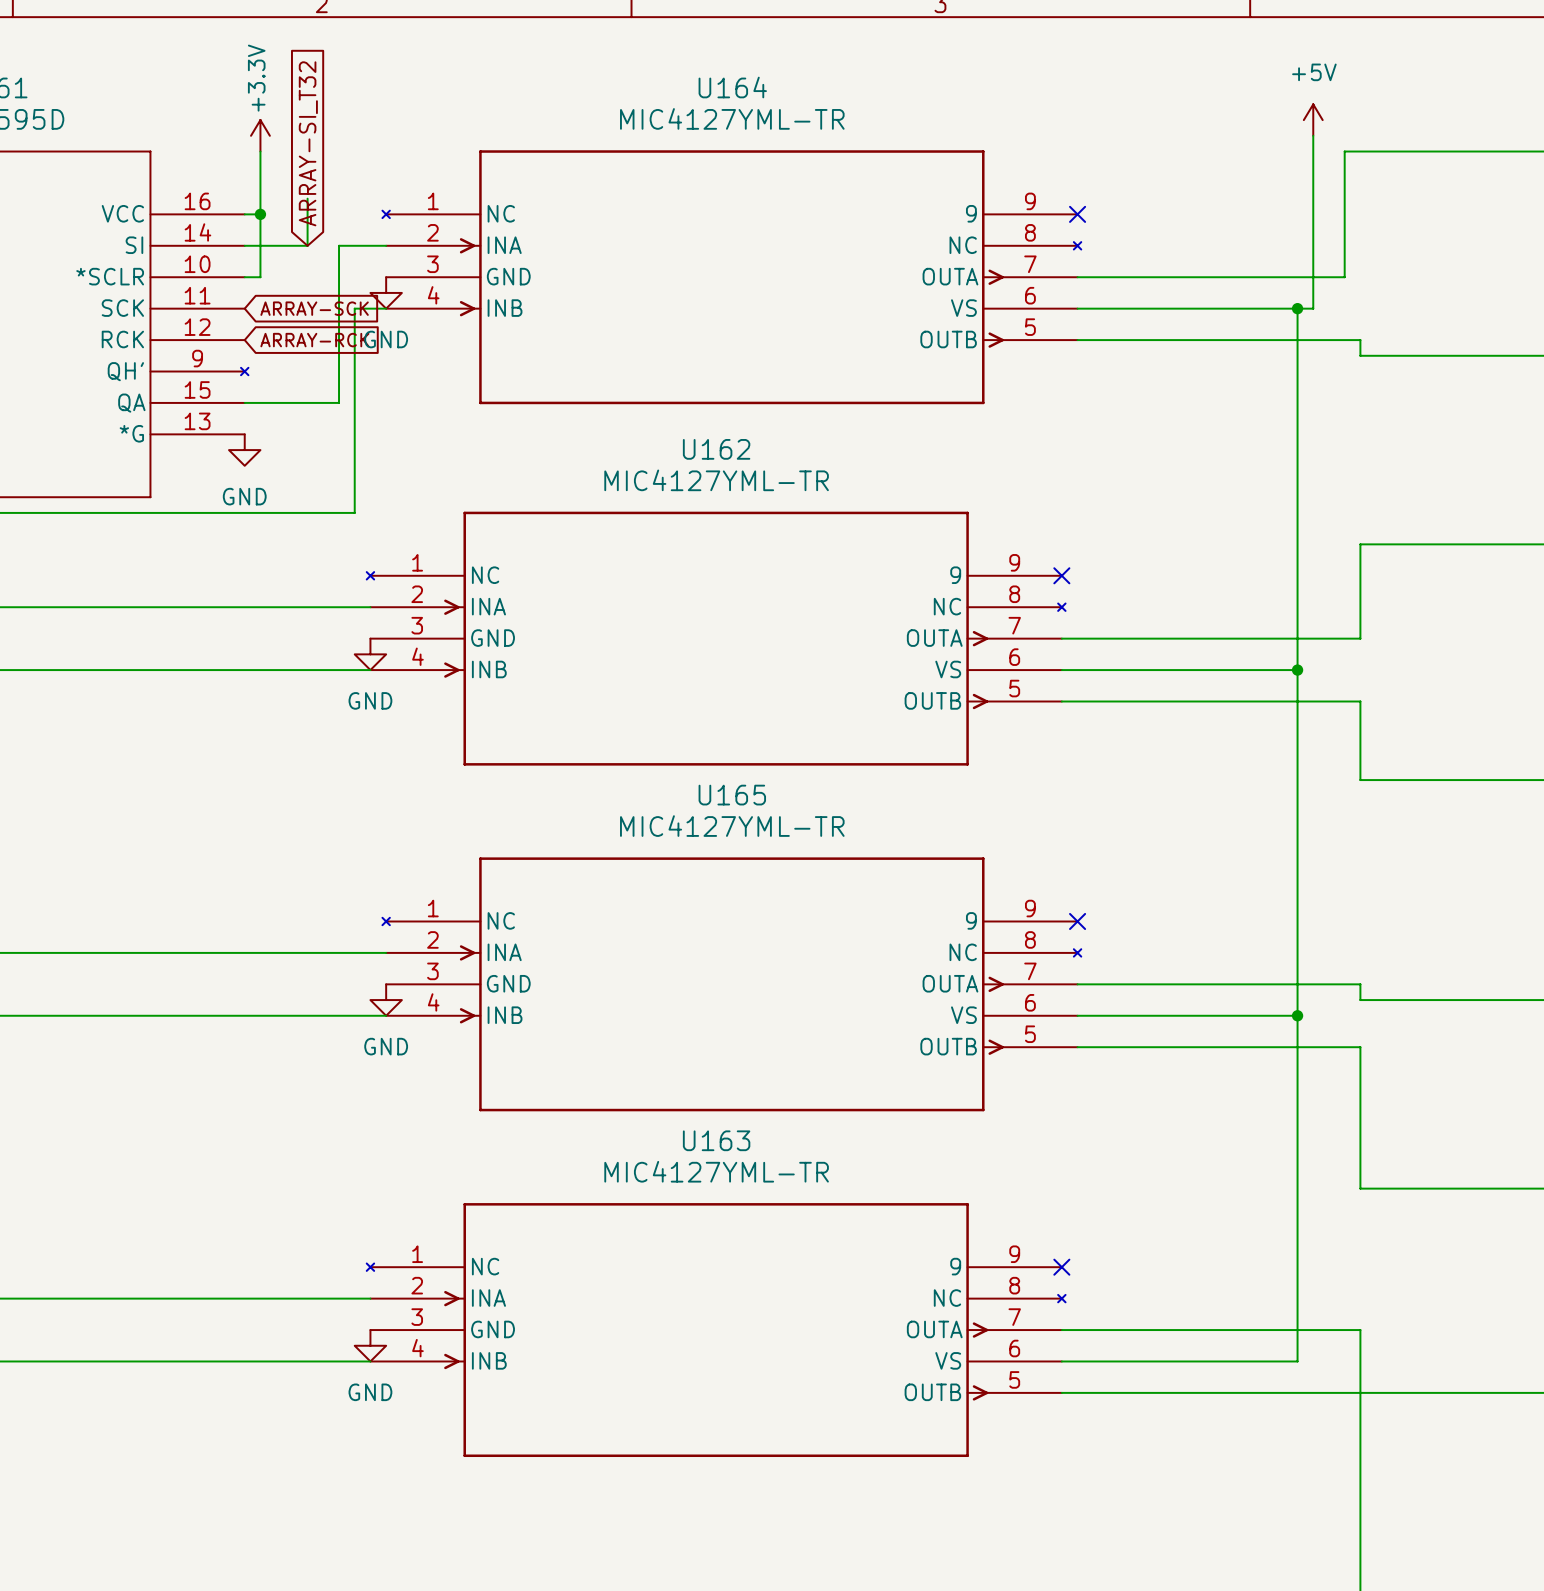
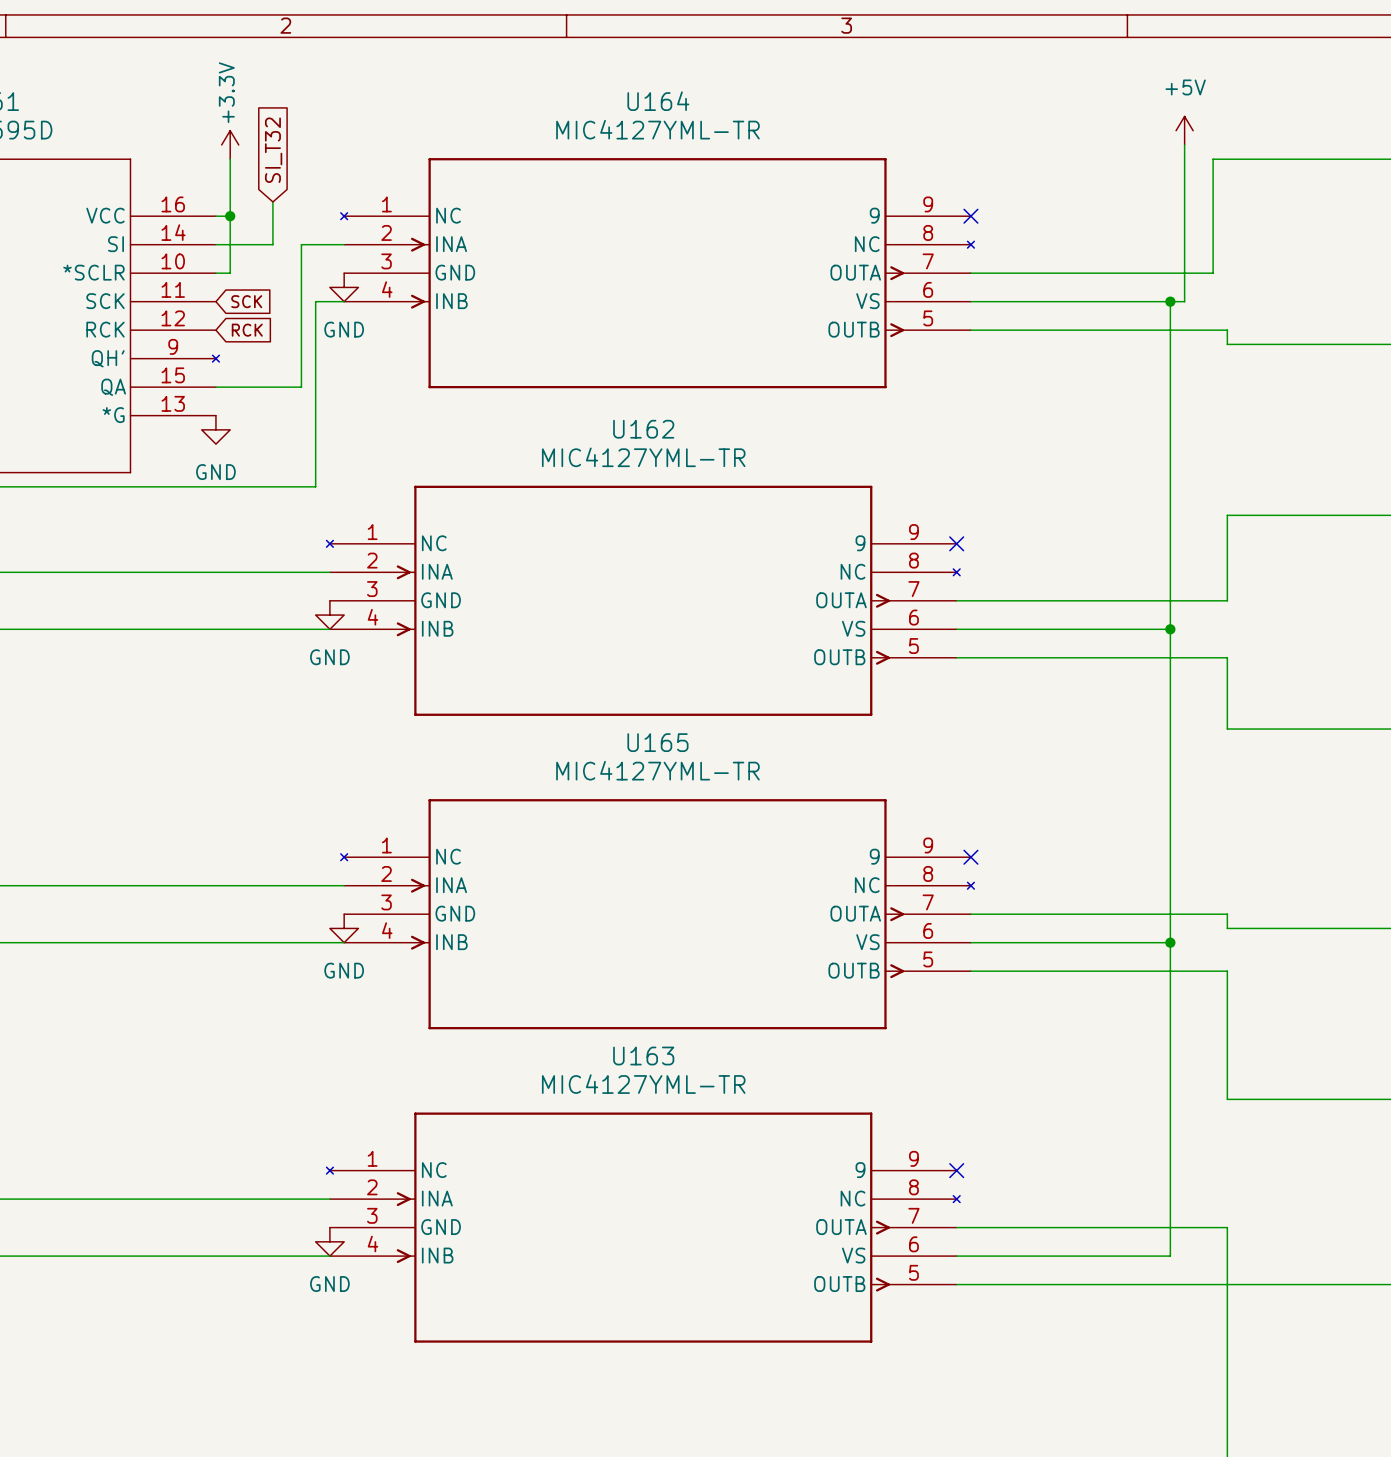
global label: ARRAY-SI_T32 (308, 143) -> SI_T32 (273, 150)
global label: ARRAY-SCK (314, 308) -> SCK (246, 301)
global label: ARRAY-RCK (314, 340) -> RCK (247, 330)

